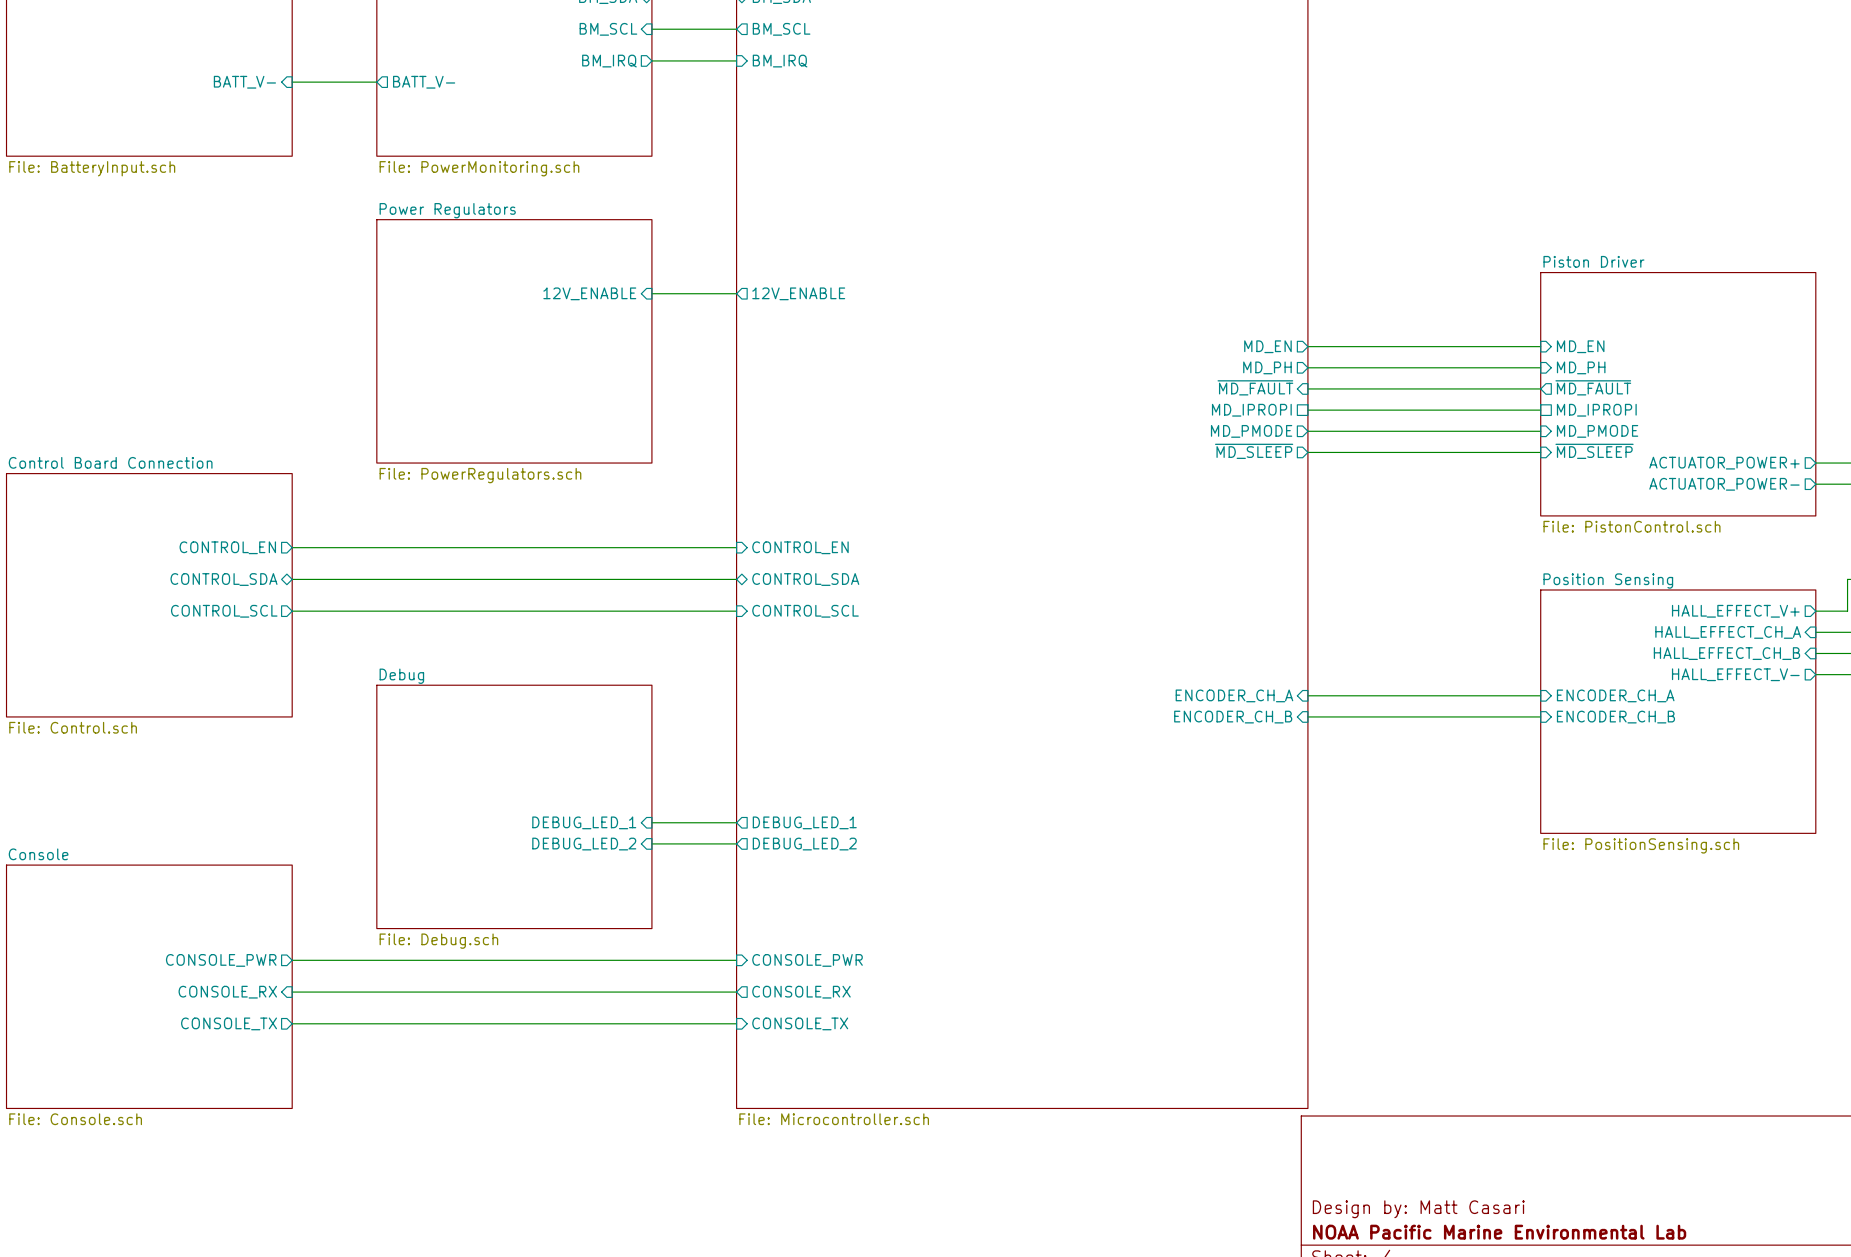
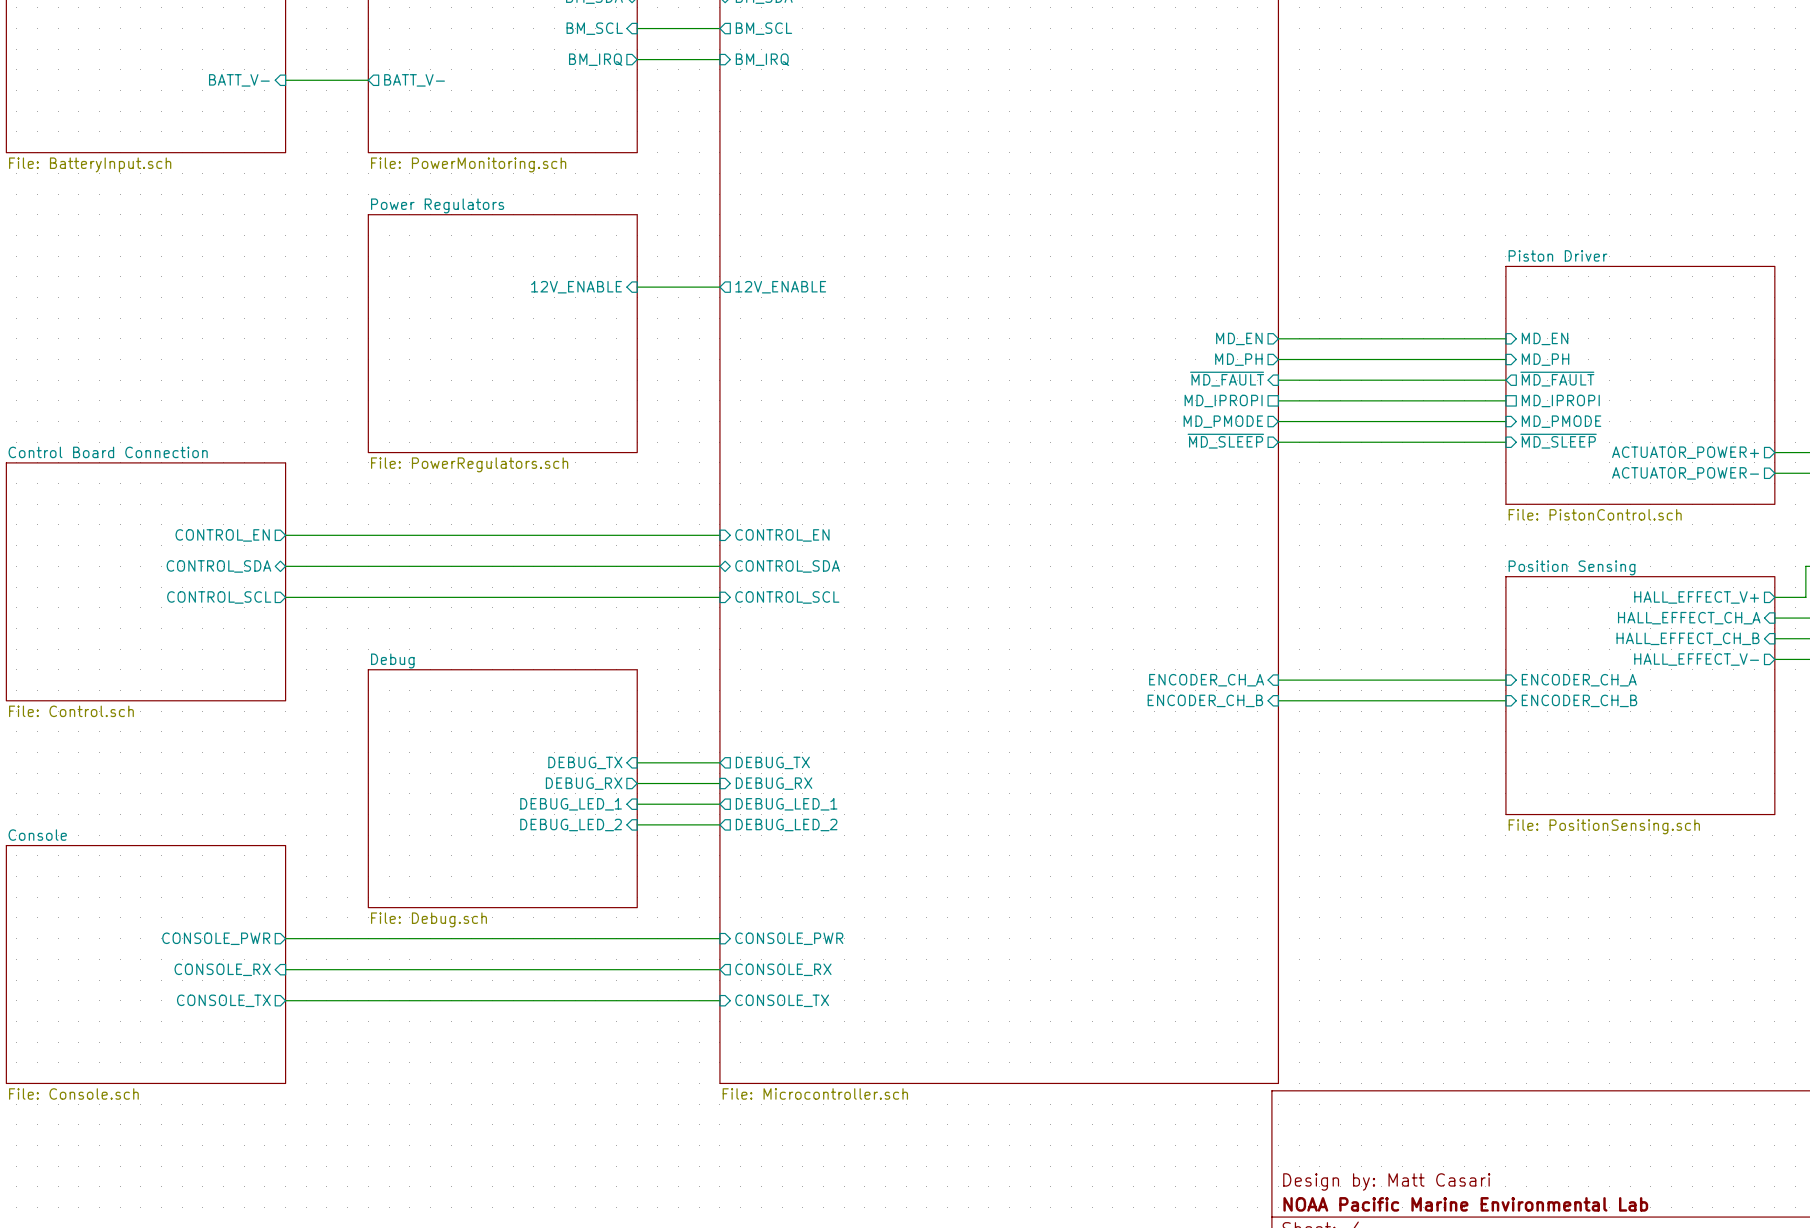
sheet pin: none -> DEBUG_TX (585, 762)
wire: none -> (637, 762) (719, 762)
sheet pin: none -> DEBUG_TX (772, 762)
sheet pin: none -> DEBUG_RX (584, 783)
wire: none -> (637, 783) (719, 783)
sheet pin: none -> DEBUG_RX (774, 783)

